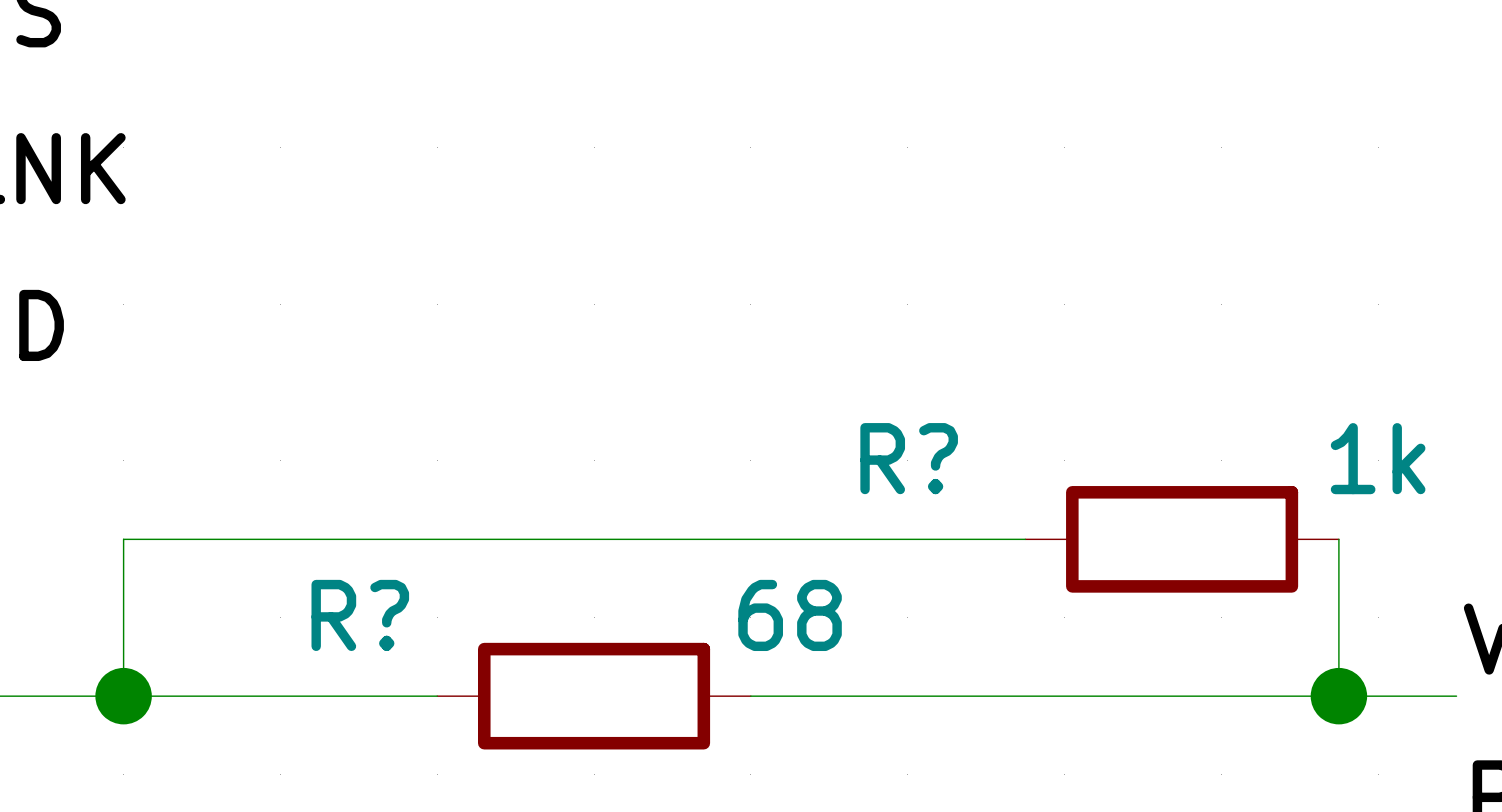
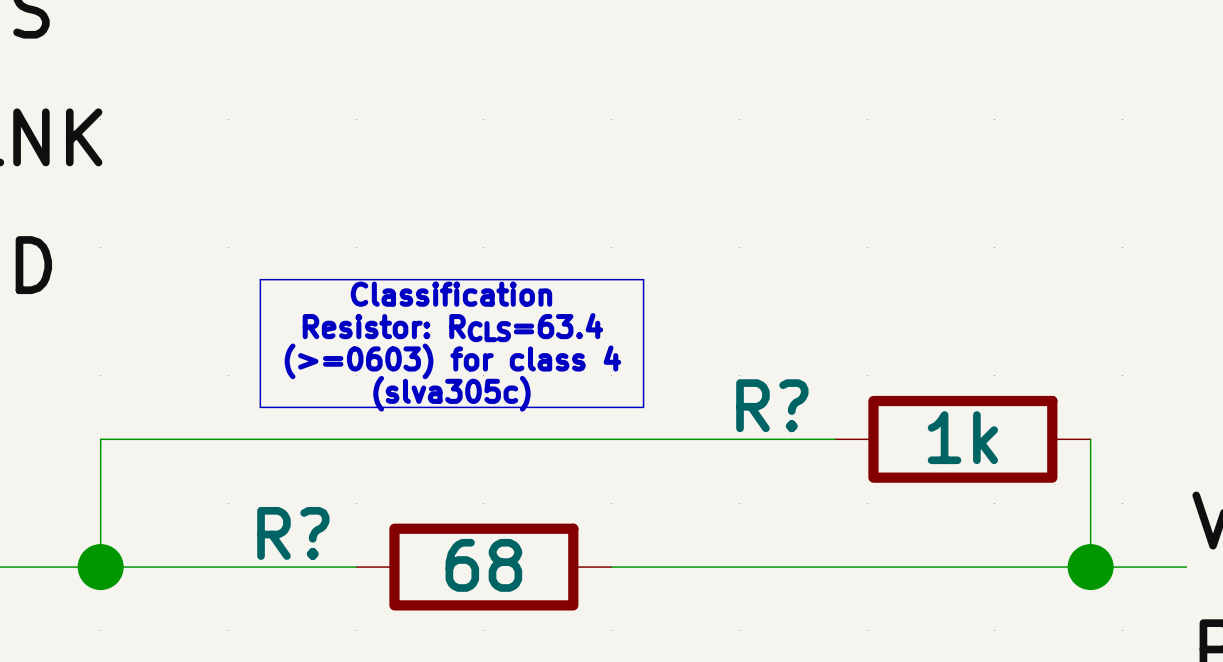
line: none -> (260, 279) (643, 279) (643, 407) (260, 407) (260, 279)
text: none -> Classification (451, 294)
text: none -> Resistor: RCLS=63.4 (452, 327)
text: none -> (>=0603) for class 4 (452, 361)
R? name position: R? (909, 458) -> R? (772, 405)
R? value position: 1k (1378, 458) -> 1k (962, 437)
text: none -> (slva305c) (451, 393)
R? name position: R? (360, 615) -> R? (293, 533)
R? value position: 68 (790, 615) -> 68 (483, 565)

